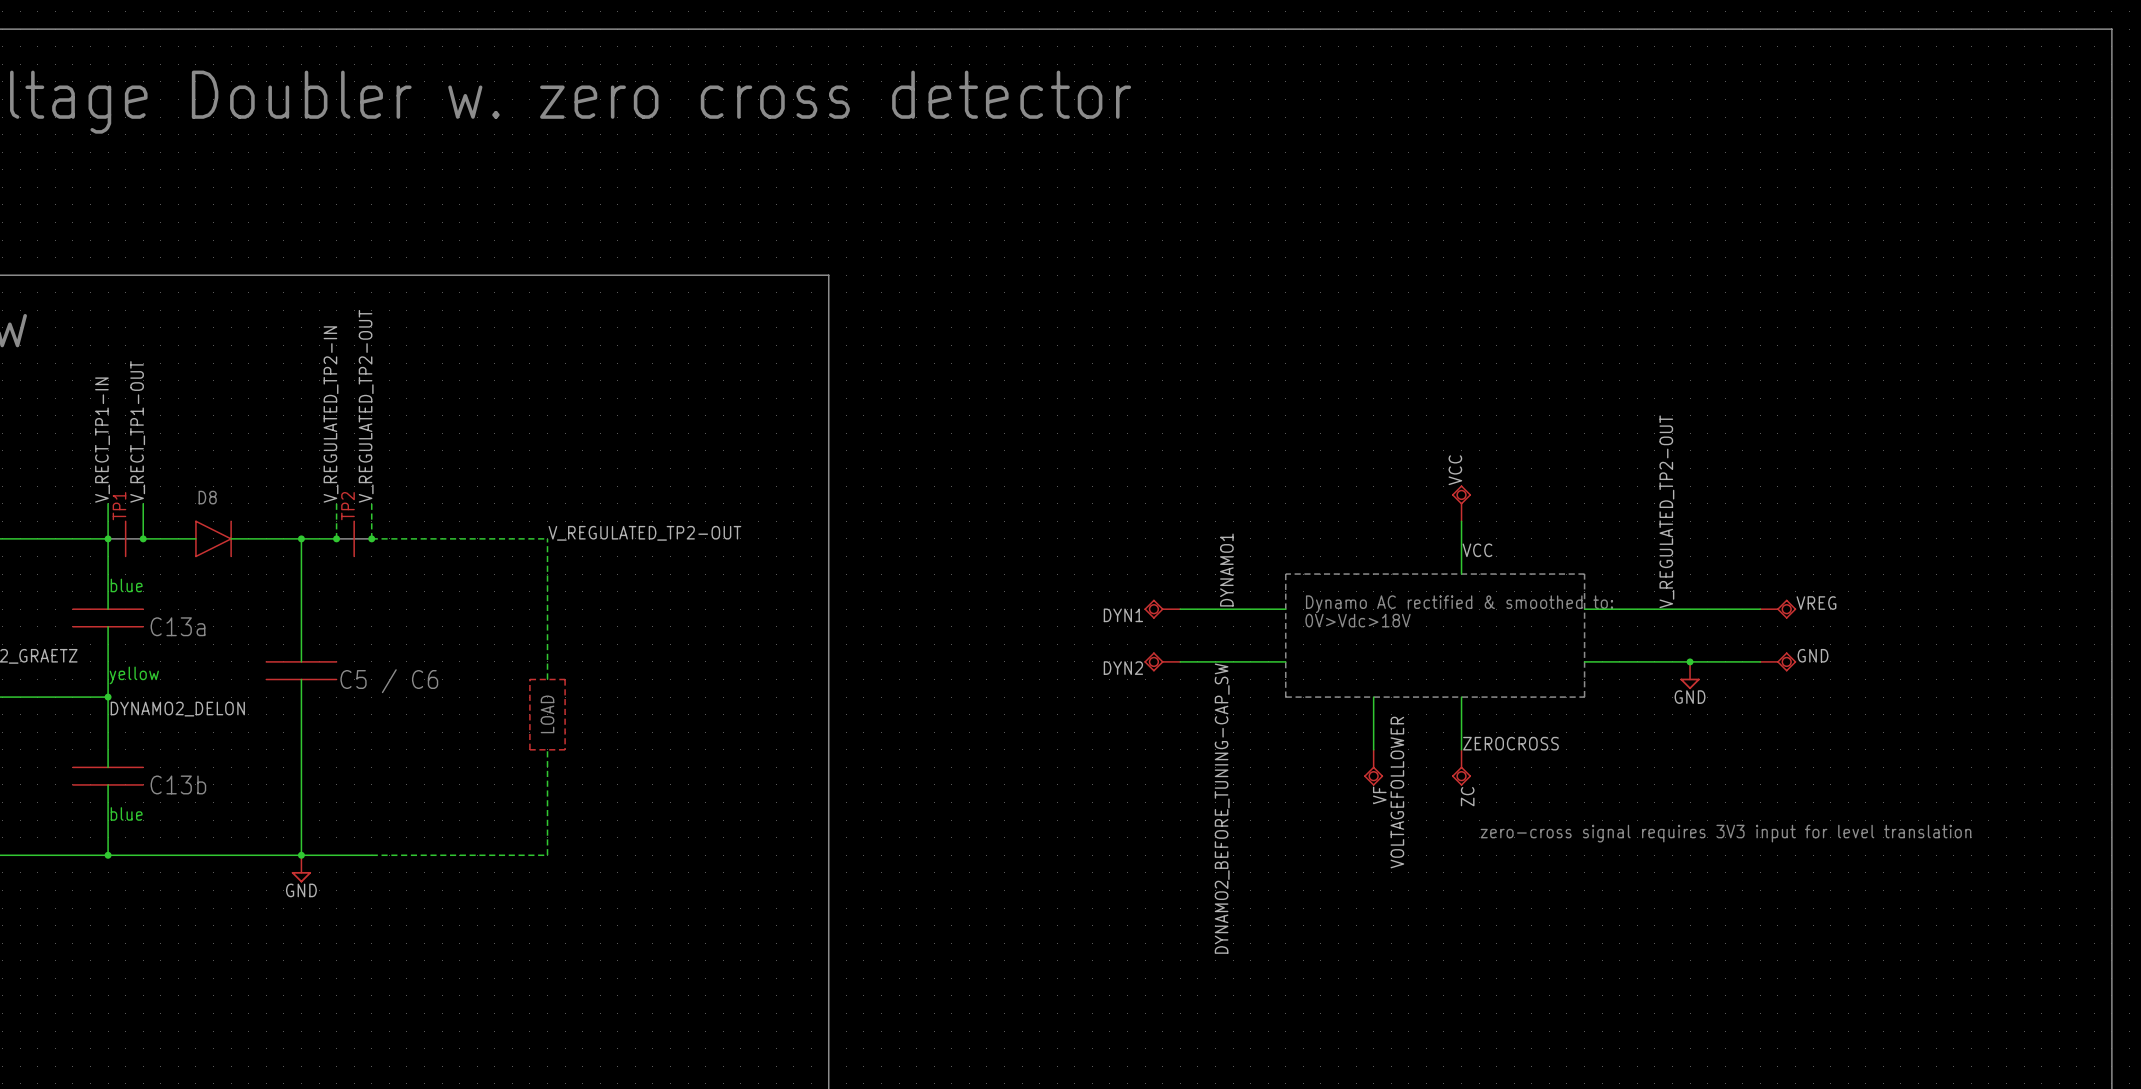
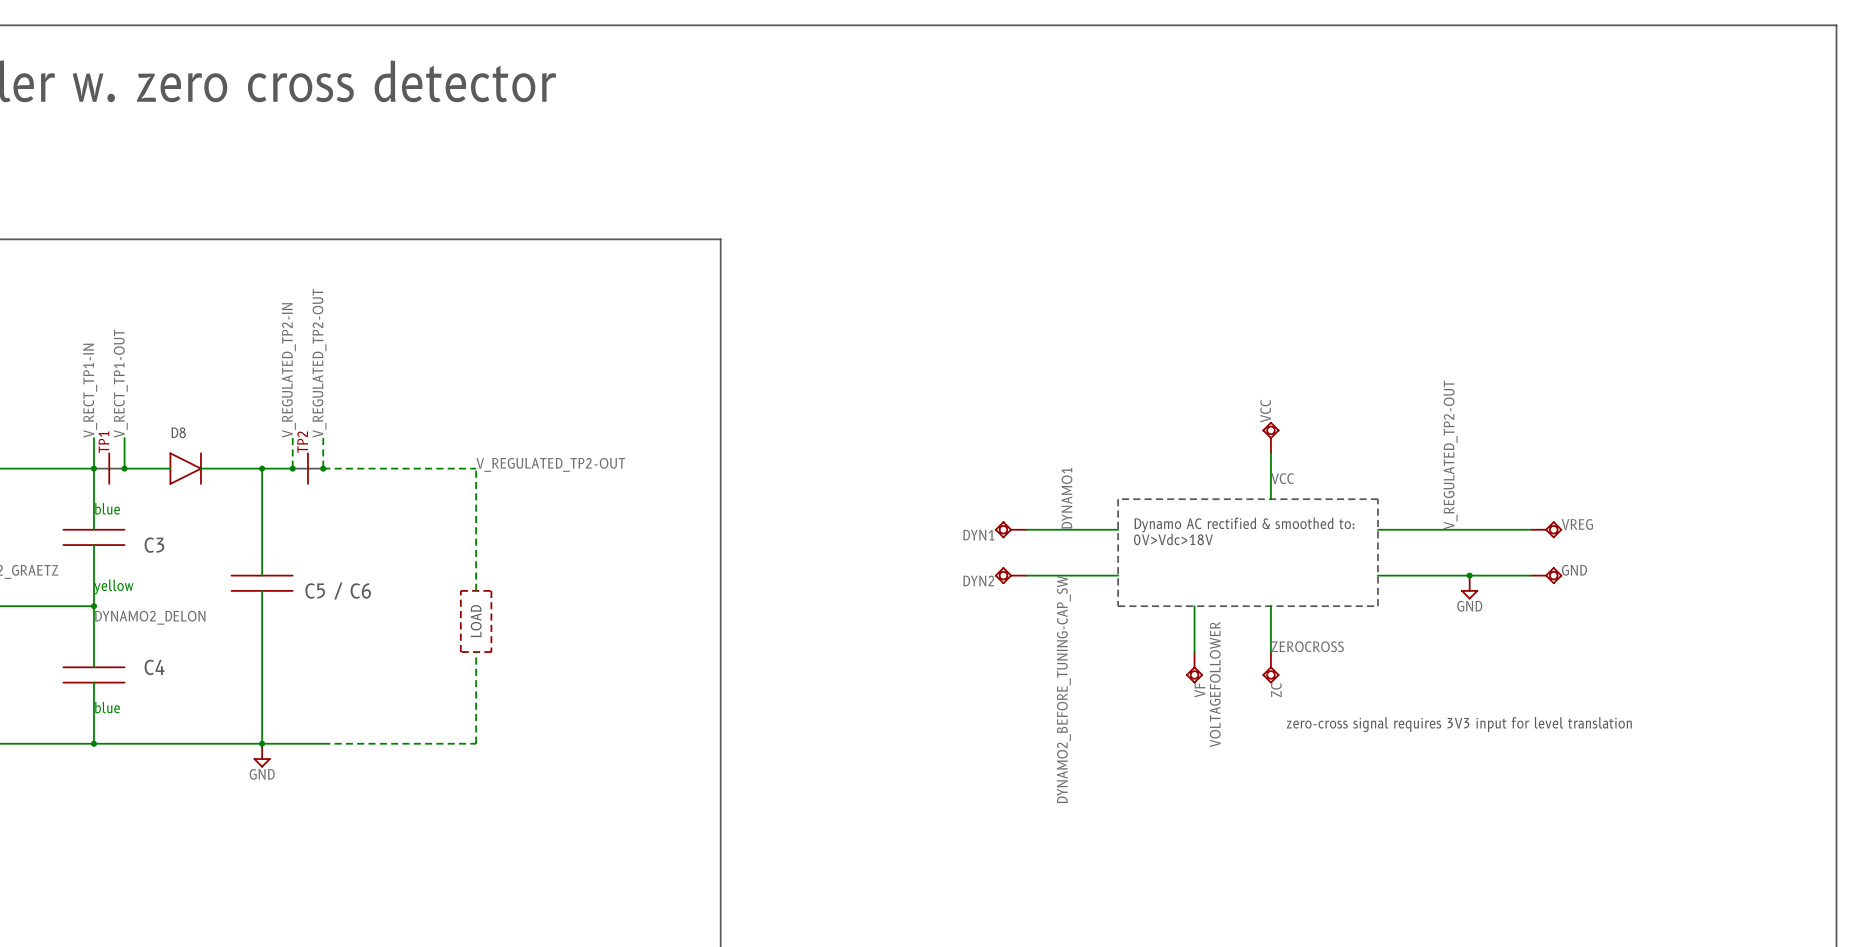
text: C13a (178, 626) -> C3 (154, 545)
text: none -> C4 (154, 667)
text: C13b (178, 784) -> none

